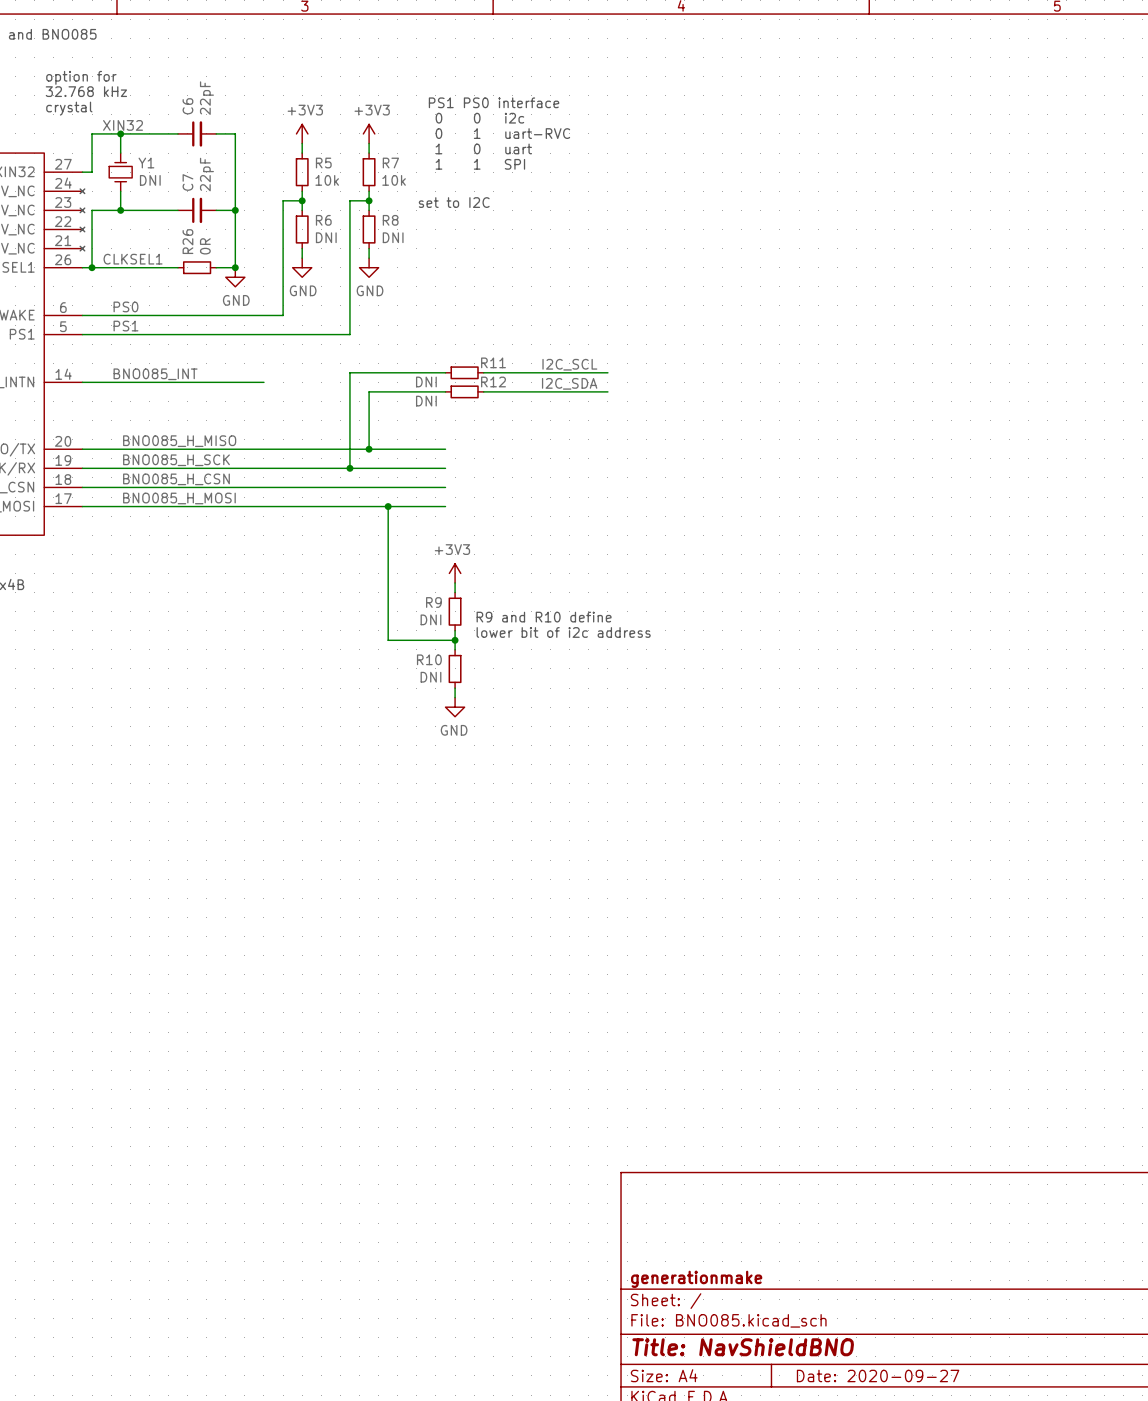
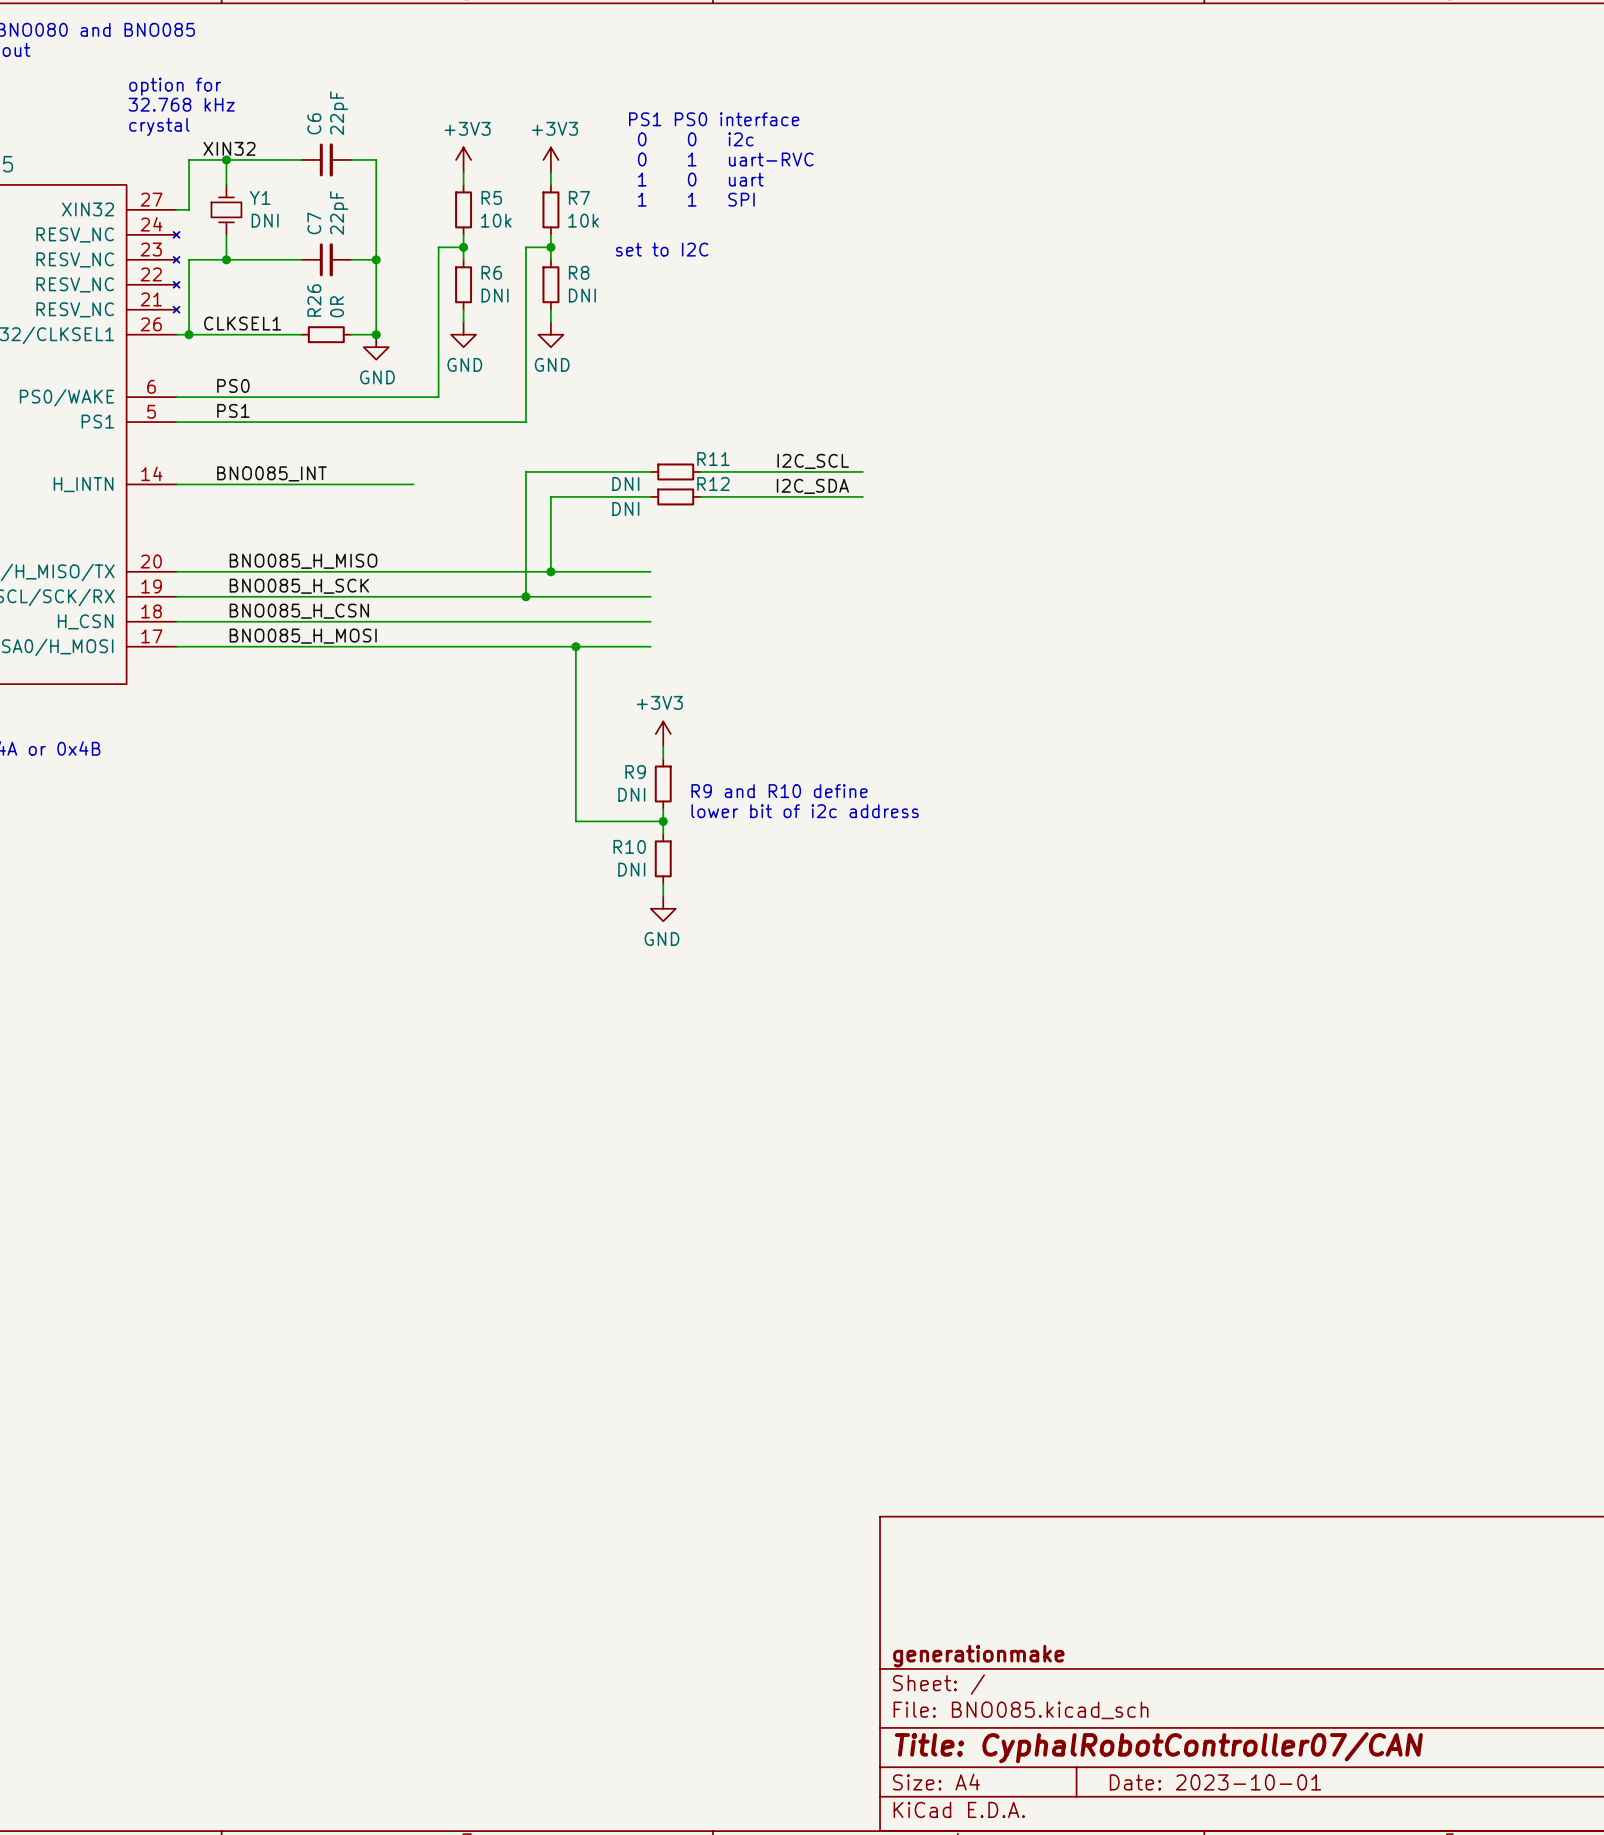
title block: Title: NavShieldBNO (743, 1347) -> Title: CyphalRobotController07/CAN (1158, 1747)
title block: Date: 2020-09-27 (878, 1375) -> Date: 2023-10-01 (1215, 1782)

